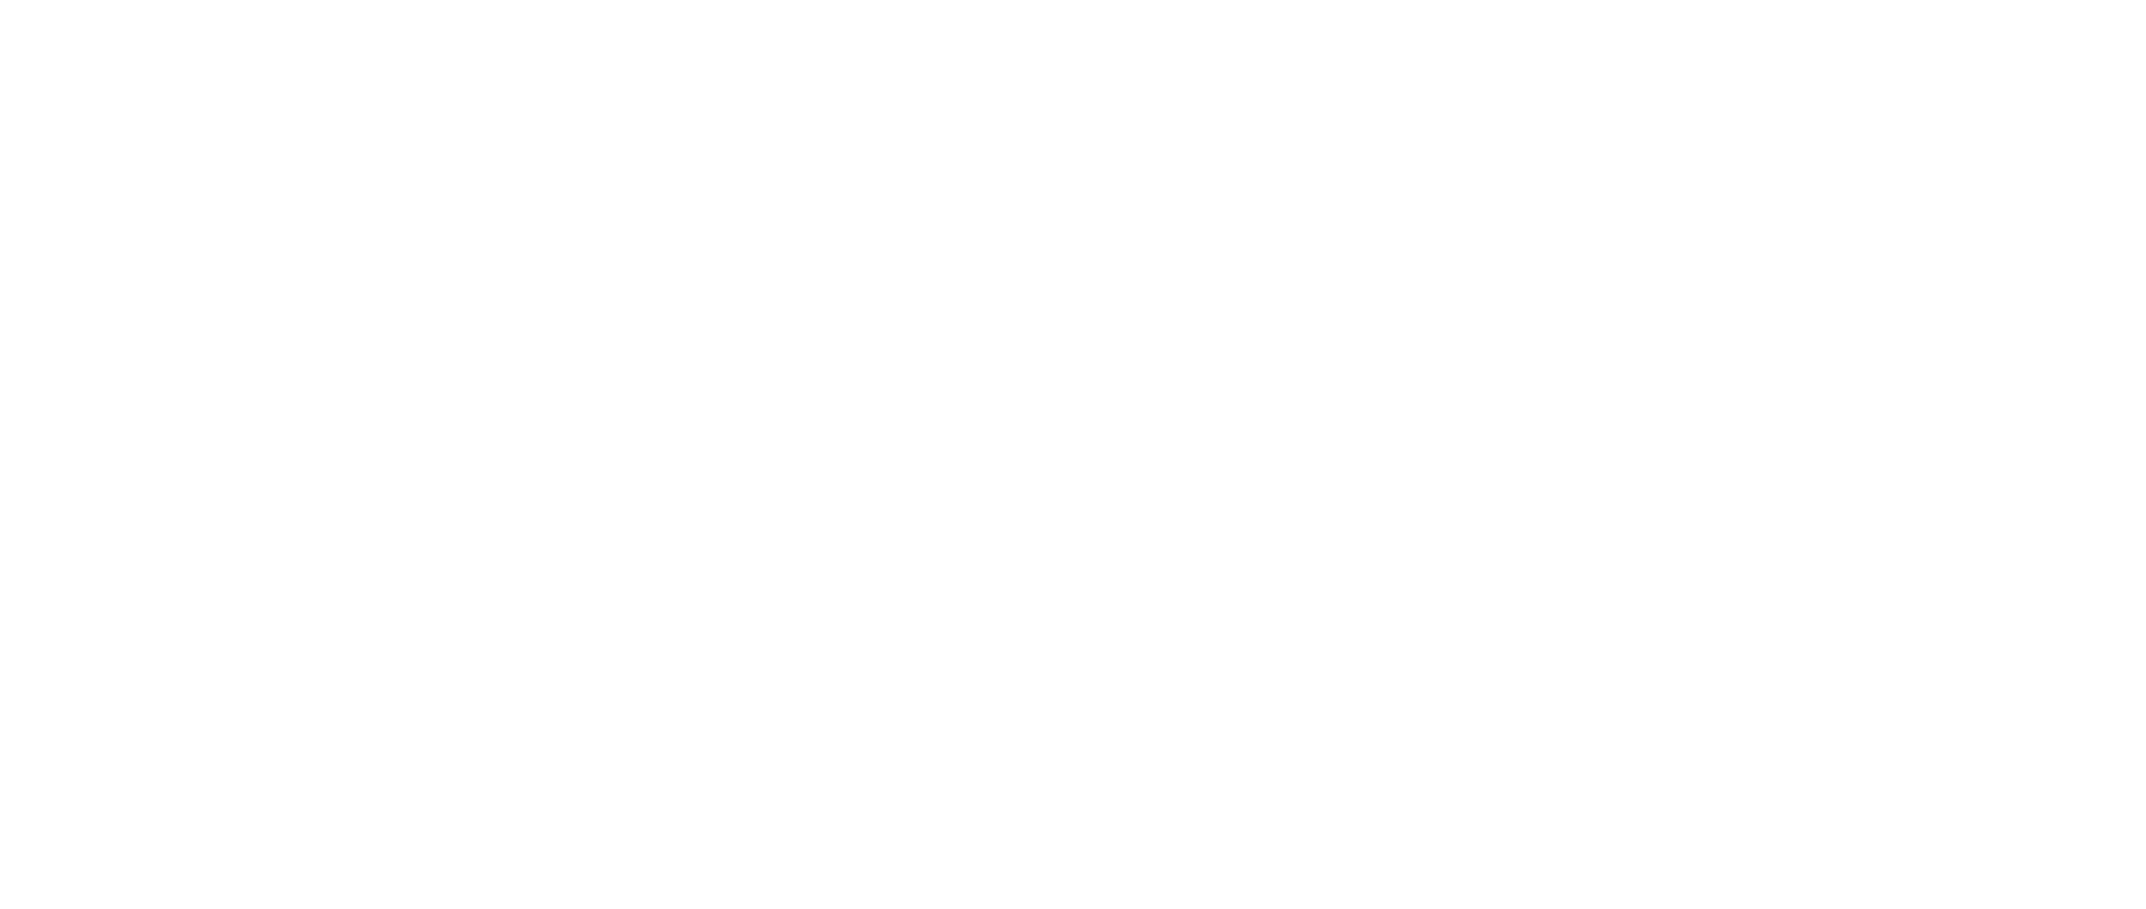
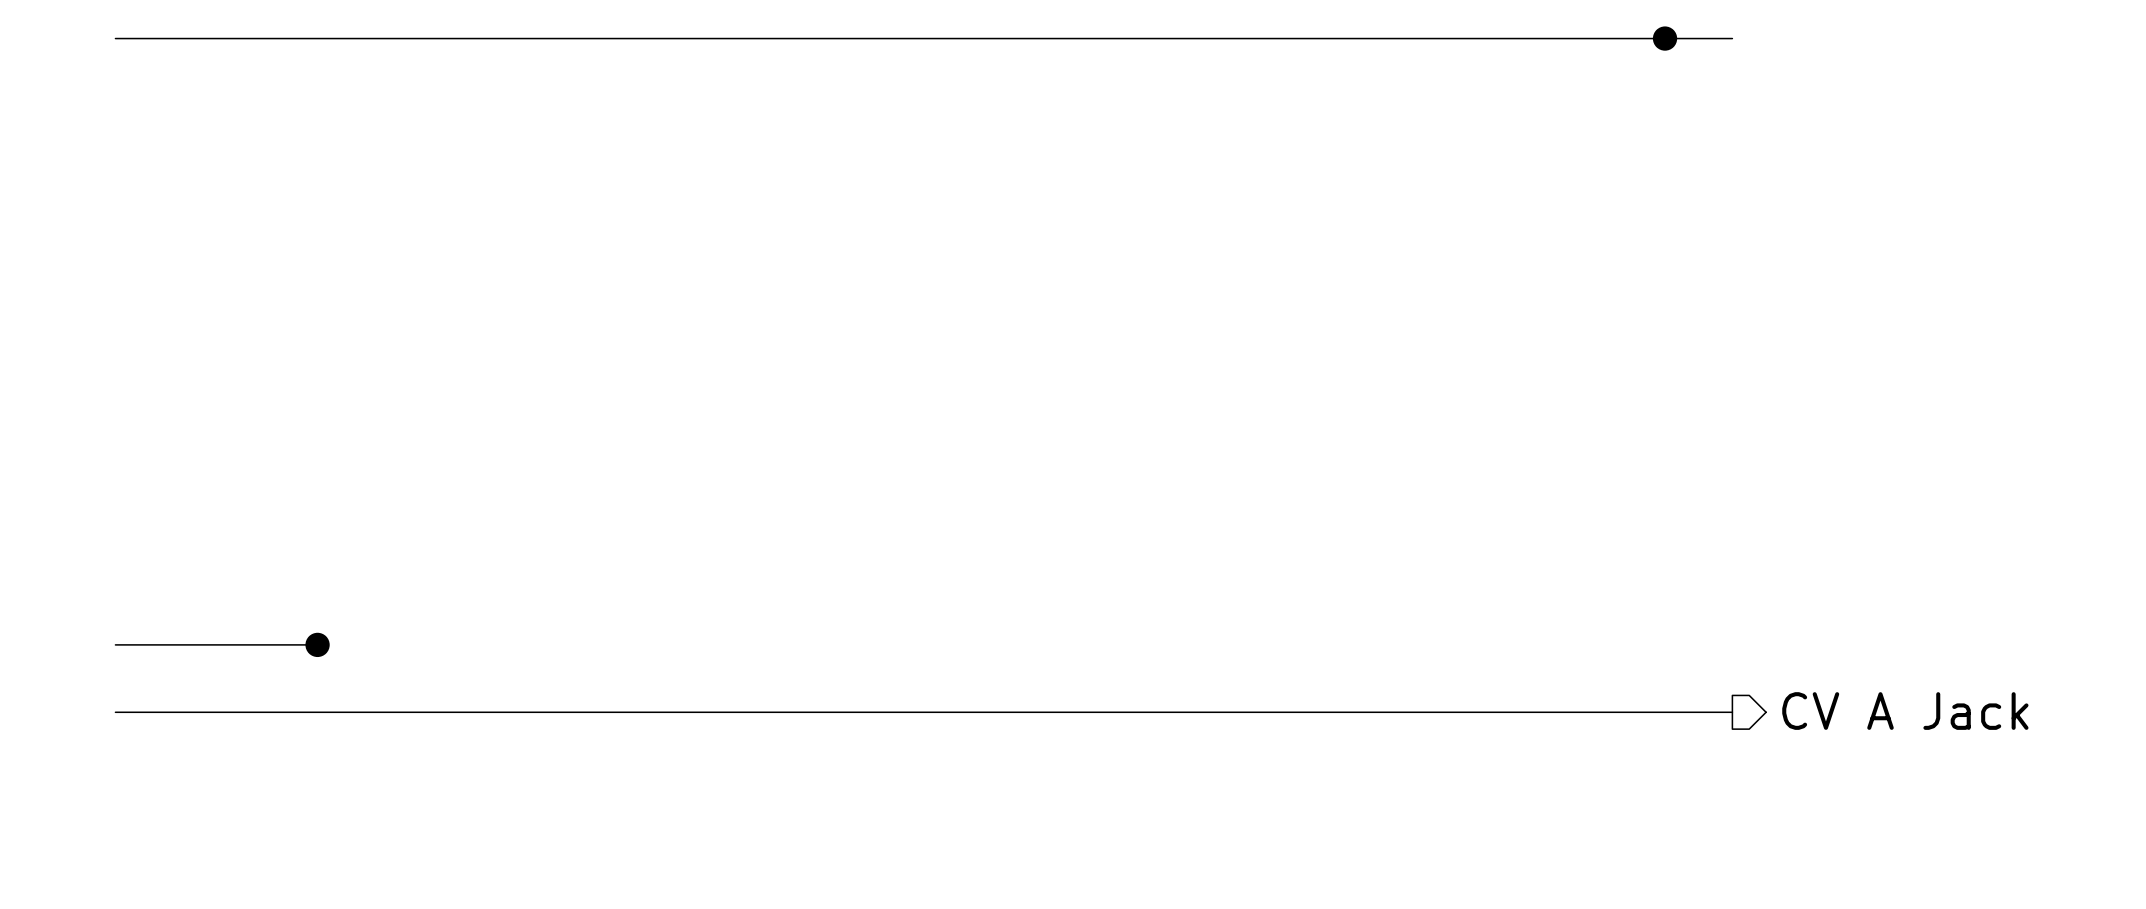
wire: none -> (115, 38) (1732, 38)
junction: none -> (1665, 38)
wire: none -> (115, 644) (317, 644)
junction: none -> (317, 644)
hierarchical label: none -> CV A Jack (1905, 711)
wire: none -> (115, 712) (1732, 712)

